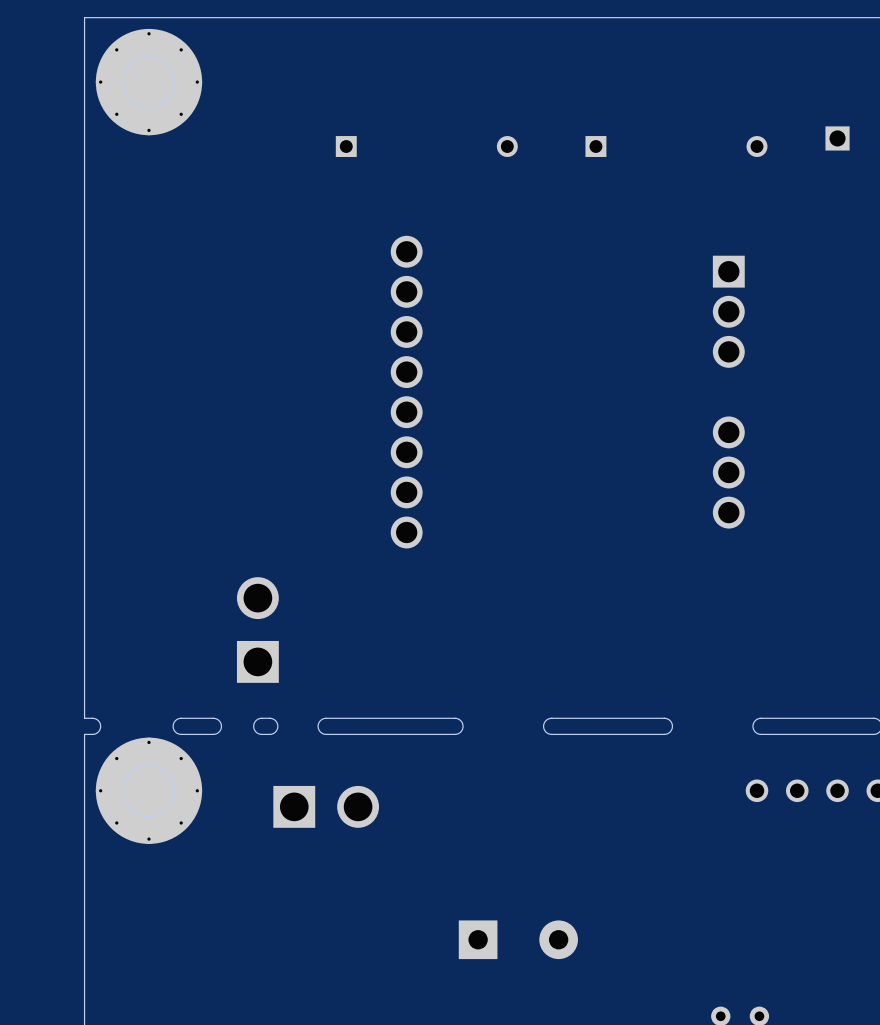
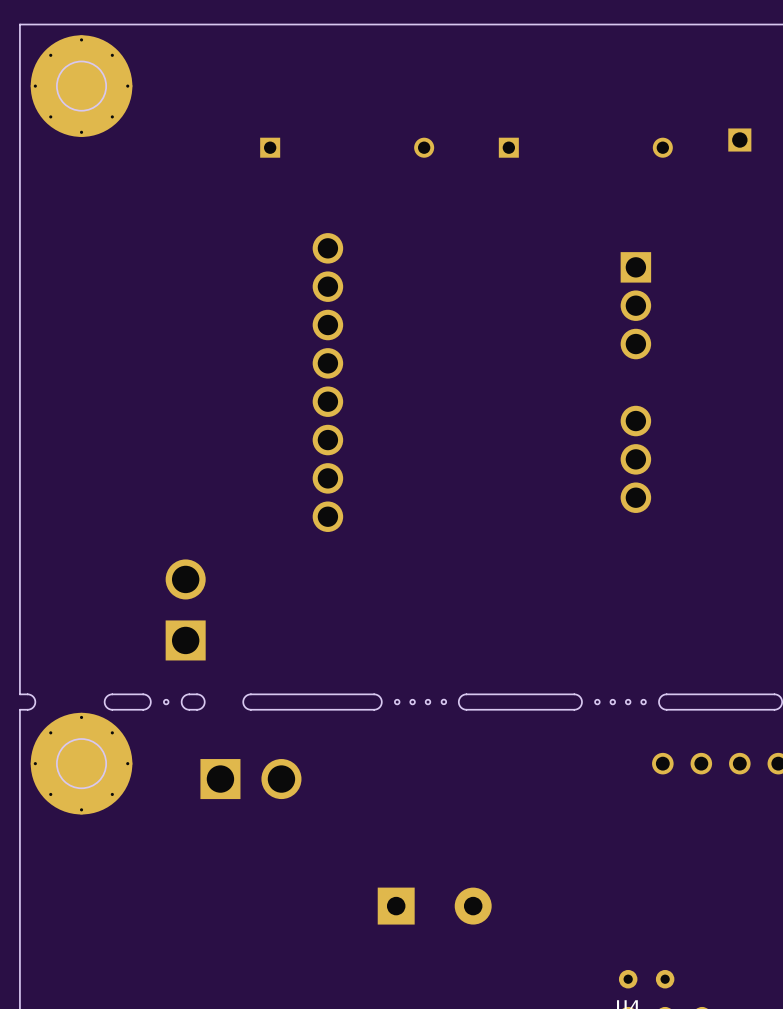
round board edge: none -> [163, 699, 169, 705]
round board edge: none -> [394, 699, 400, 705]
round board edge: none -> [409, 699, 416, 705]
round board edge: none -> [425, 699, 431, 705]
round board edge: none -> [441, 699, 447, 705]
round board edge: none -> [594, 699, 601, 705]
round board edge: none -> [610, 699, 616, 705]
round board edge: none -> [625, 699, 631, 705]
round board edge: none -> [640, 699, 647, 705]

